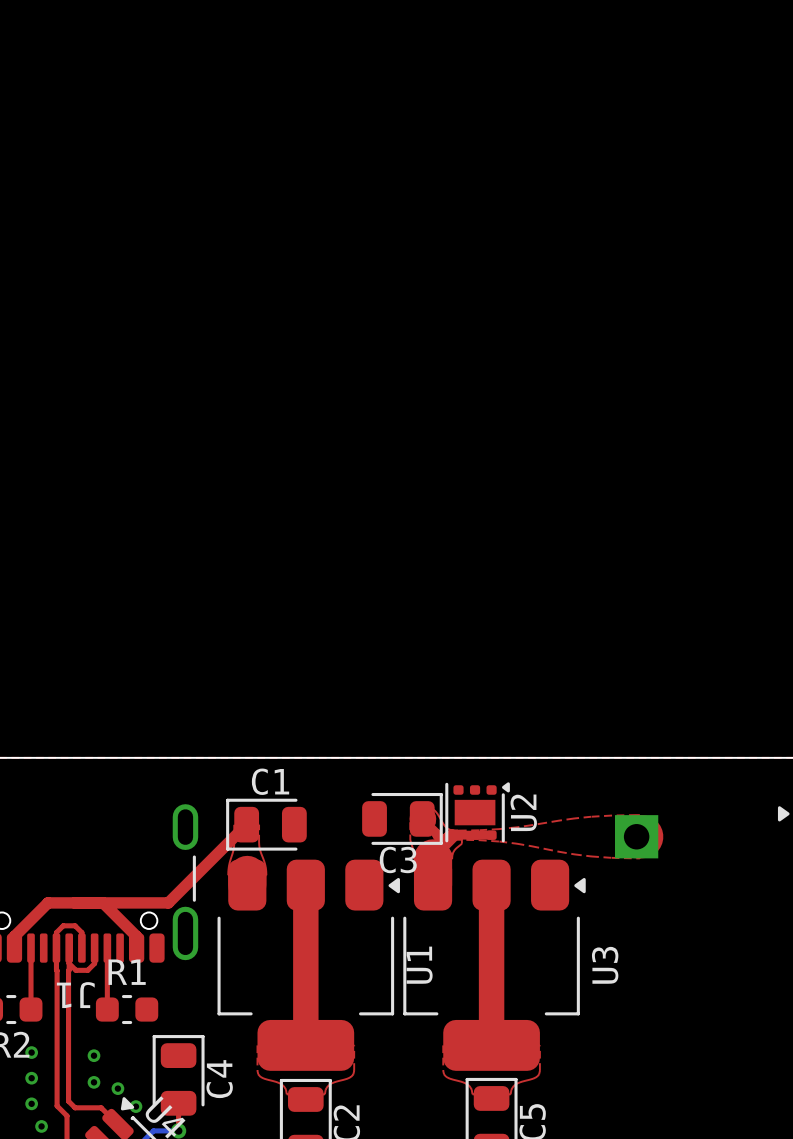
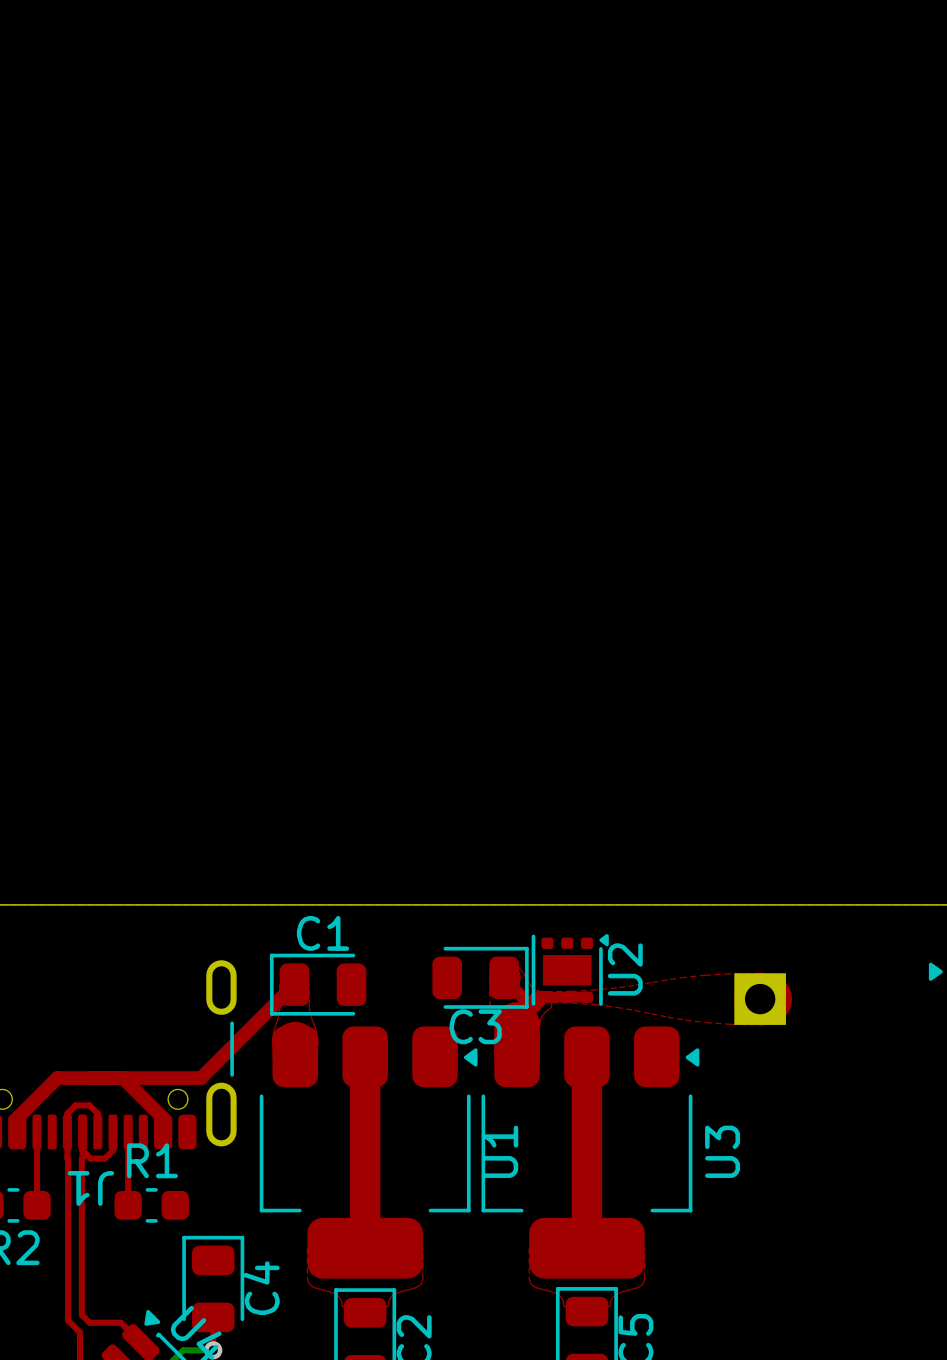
via: (31, 1052) -> none
via: (93, 1055) -> none
via: (31, 1078) -> none
via: (93, 1082) -> none
via: (117, 1088) -> none
via: (31, 1103) -> none
via: (135, 1106) -> none
via: (41, 1126) -> none

